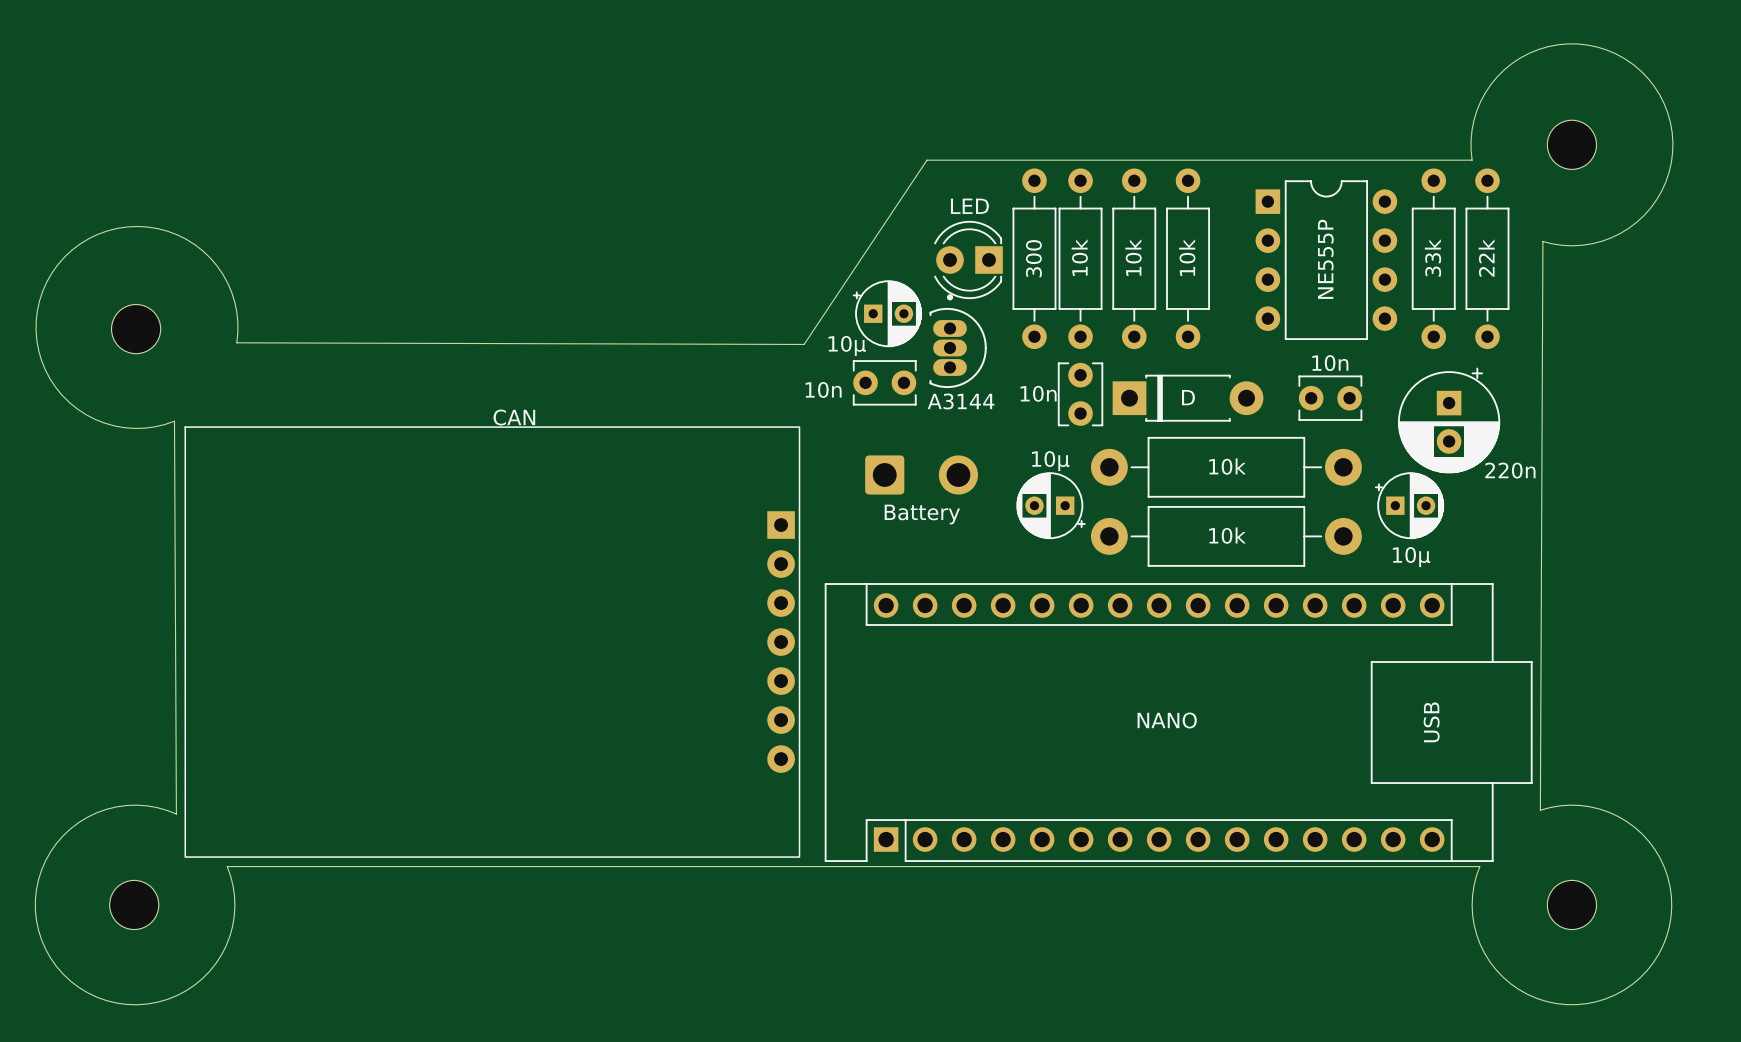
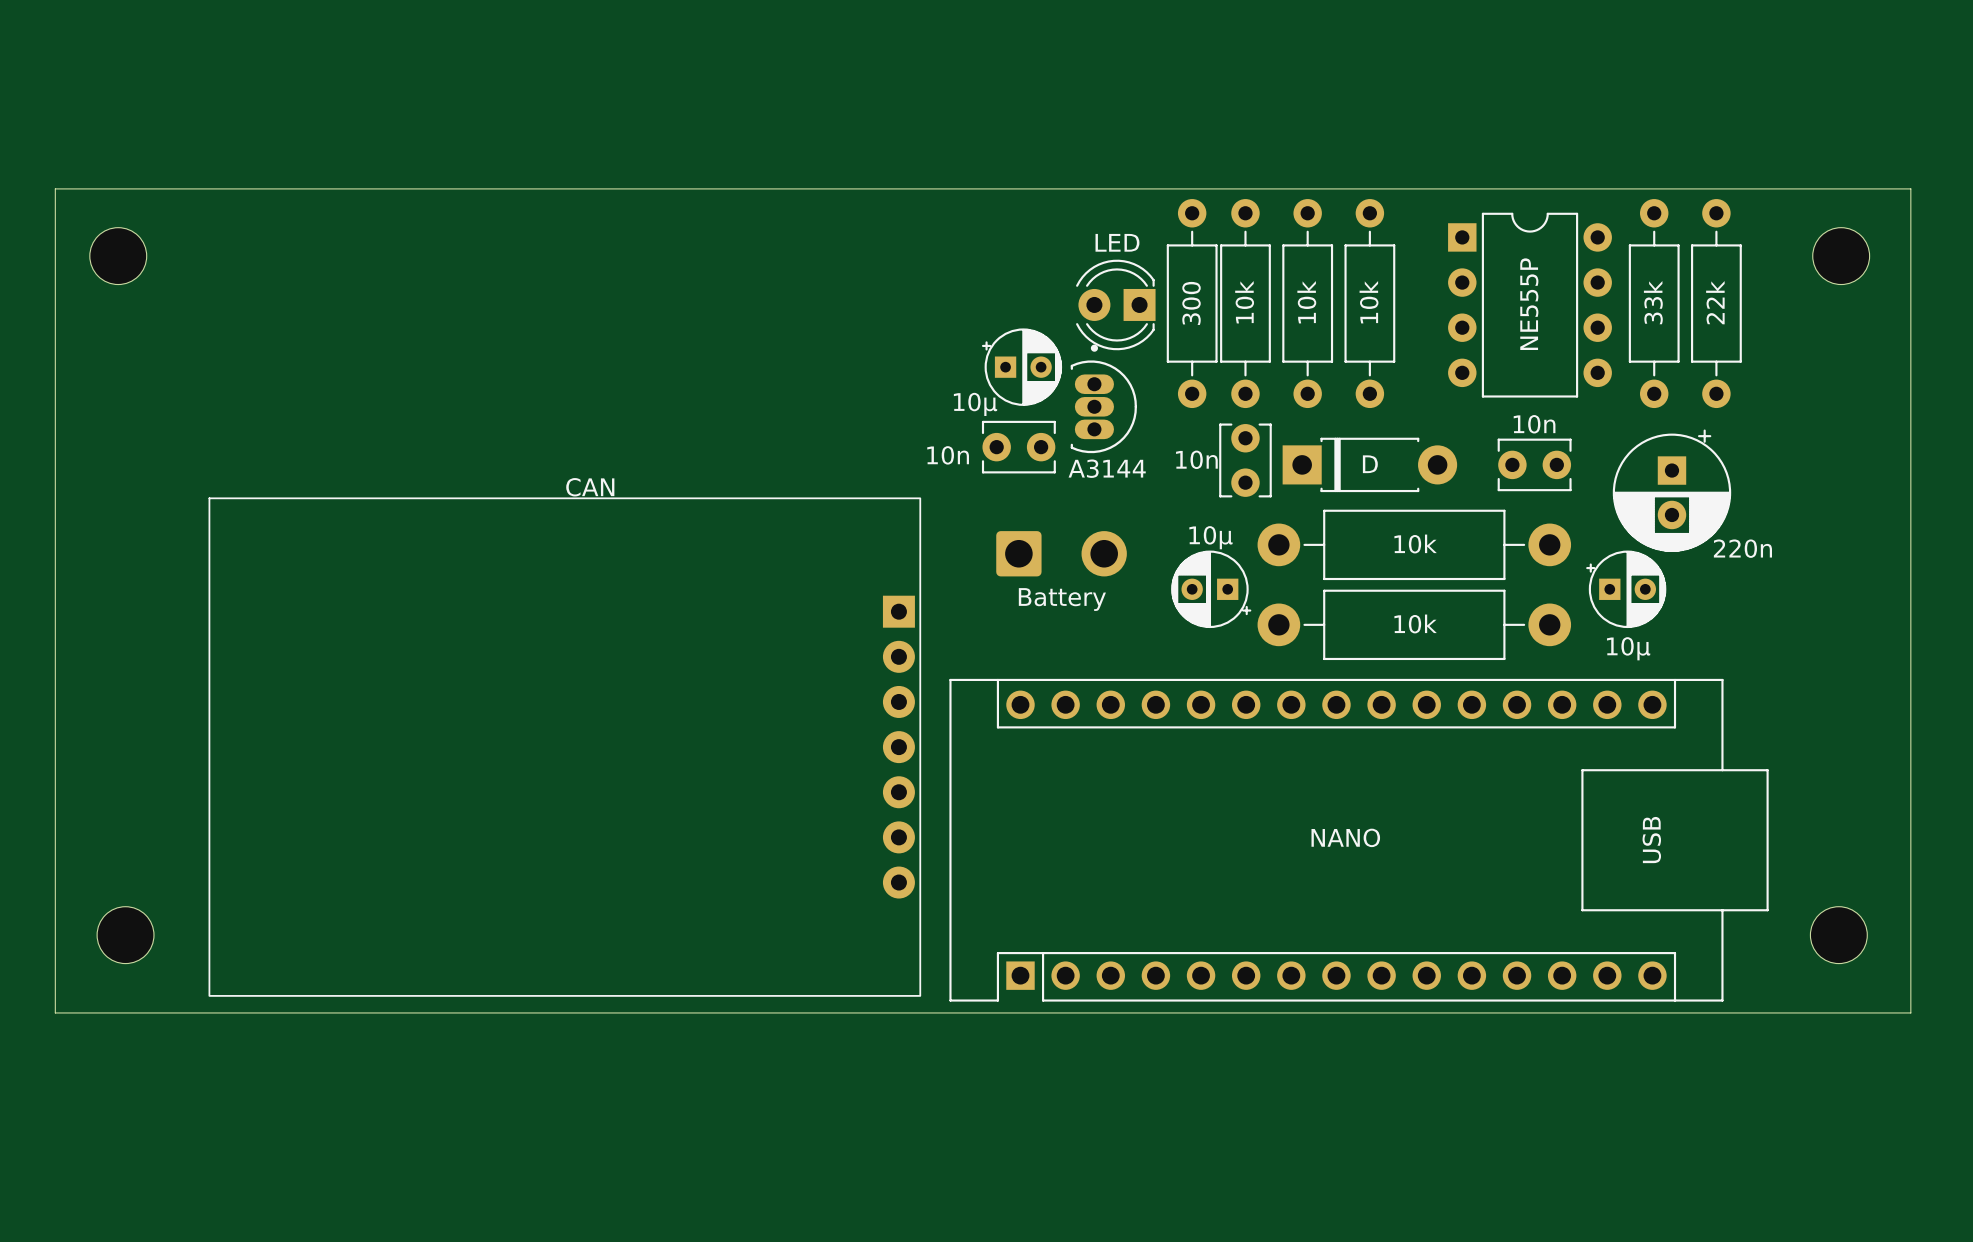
part position: (1571, 144) -> (1841, 256)
board edge: (926, 160) (804, 344) (236, 342) (237, 322) (234, 302) (222, 274) (203, 251) (177, 234) (148, 227) (117, 228) (88, 238) (64, 256) (46, 281) (39, 300) (36, 320) (36, 341) (41, 360) (55, 387) (77, 409) (104, 423) (124, 427) (144, 428) (174, 421) (176, 814) (146, 805) (116, 806) (96, 812) (78, 822) (56, 843) (41, 870) (36, 889) (35, 910) (41, 940) (50, 958) (63, 974) (87, 992) (106, 1000) (126, 1004) (157, 1002) (185, 991) (202, 978) (215, 963) (229, 936) (234, 906) (233, 886) (227, 866) (1479, 866) (1473, 885) (1472, 905) (1476, 935) (1490, 962) (1510, 983) (1527, 994) (1546, 1001) (1576, 1004) (1605, 998) (1623, 990) (1639, 978) (1658, 954) (1669, 926) (1671, 906) (1670, 886) (1660, 858) (1649, 841) (1634, 827) (1609, 812) (1579, 805) (1559, 805) (1540, 810) (1542, 241) (1572, 245) (1602, 241) (1629, 228) (1644, 215) (1656, 199) (1669, 172) (1672, 152) (1672, 132) (1664, 103) (1648, 78) (1625, 59) (1607, 50) (1588, 45) (1558, 44) (1529, 53) (1504, 69) (1485, 92) (1476, 110) (1472, 130) (1472, 160) (926, 160) -> (55, 188) (55, 1012) (1910, 1012) (1910, 188) (55, 188)
part position: (136, 329) -> (118, 256)
part position: (134, 904) -> (125, 935)
part position: (1571, 904) -> (1838, 935)

